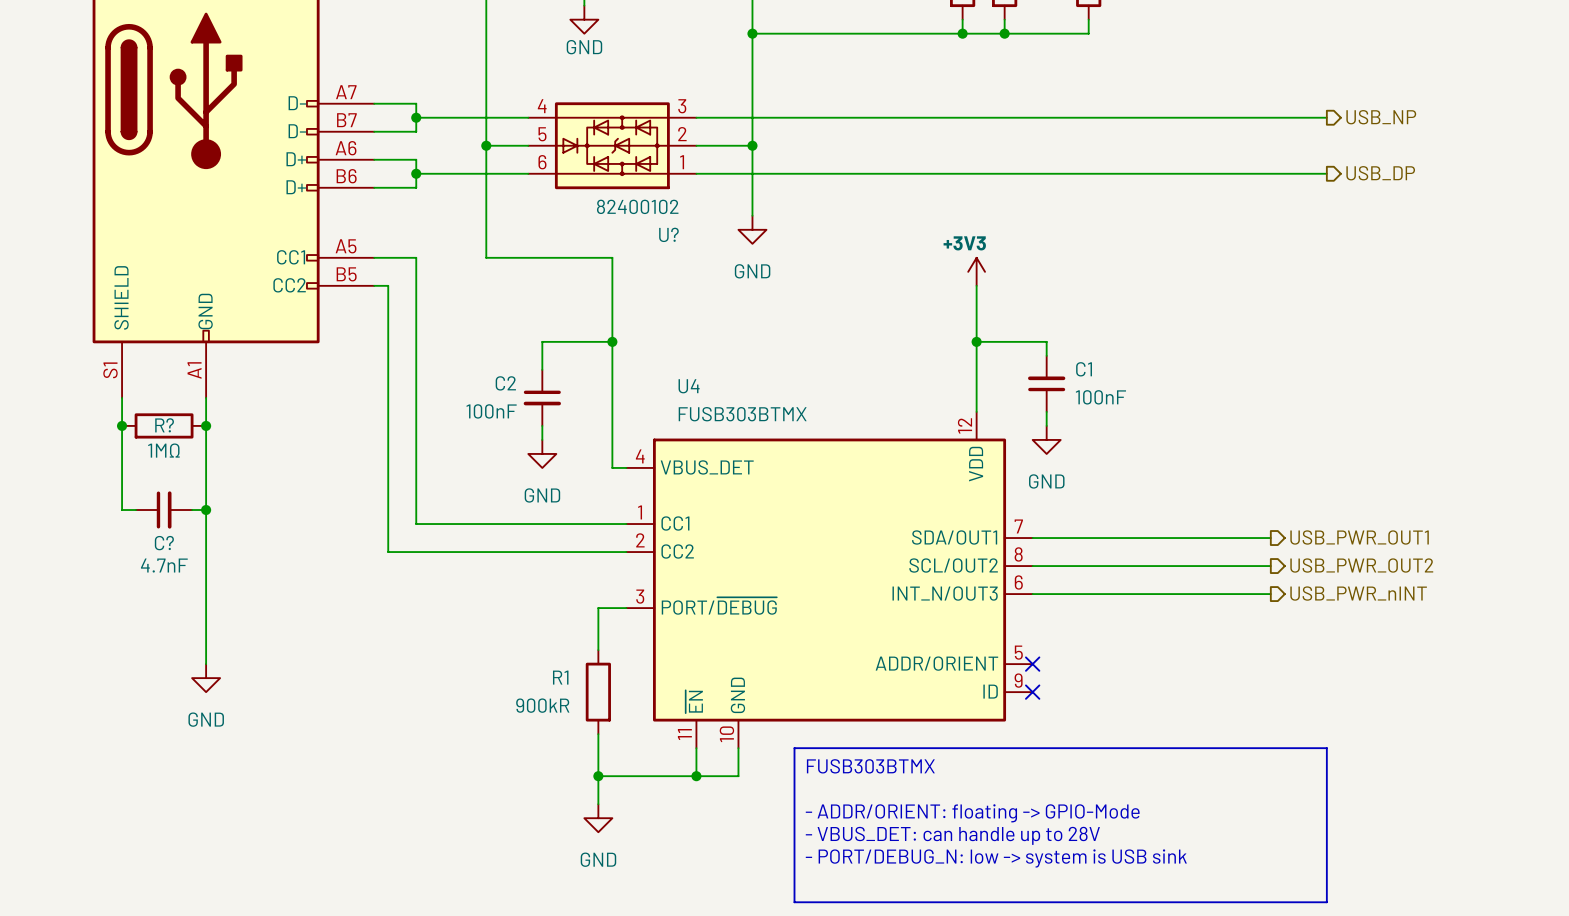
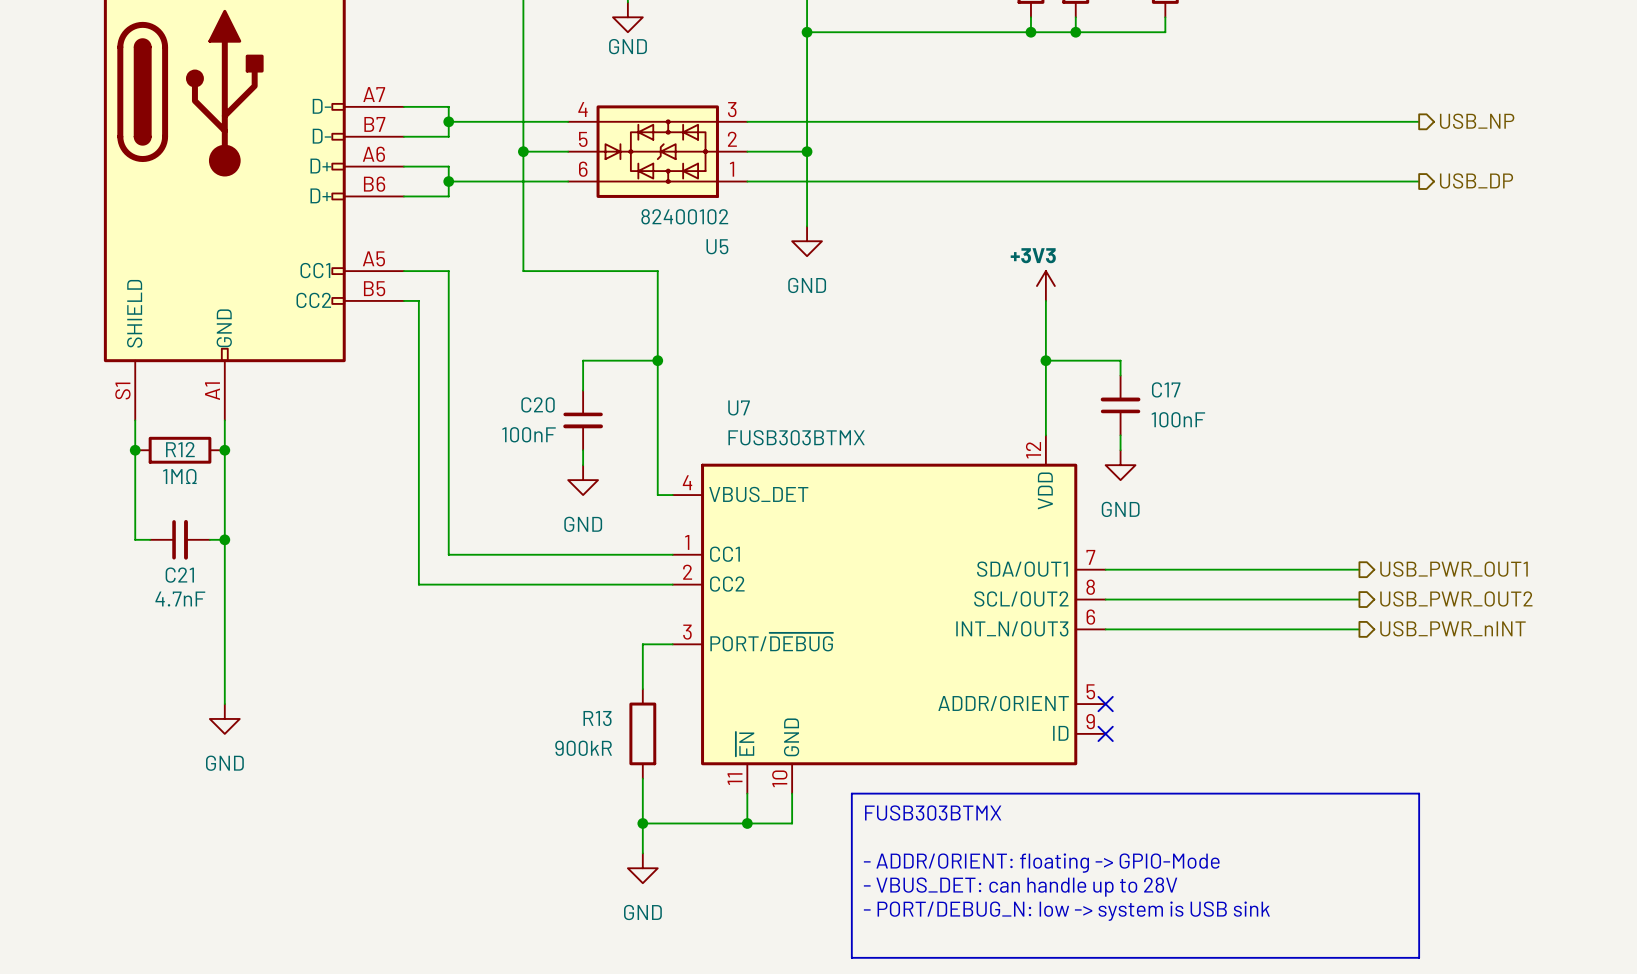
U? name: U? (668, 234) -> U5 (717, 246)
C1 name: C1 (1084, 369) -> C17 (1166, 389)
C2 name: C2 (505, 383) -> C20 (538, 404)
U4 name: U4 (689, 386) -> U7 (739, 407)
R? name: R? (164, 425) -> R12 (180, 449)
C? name: C? (164, 543) -> C21 (179, 575)
R1 name: R1 (560, 677) -> R13 (597, 718)

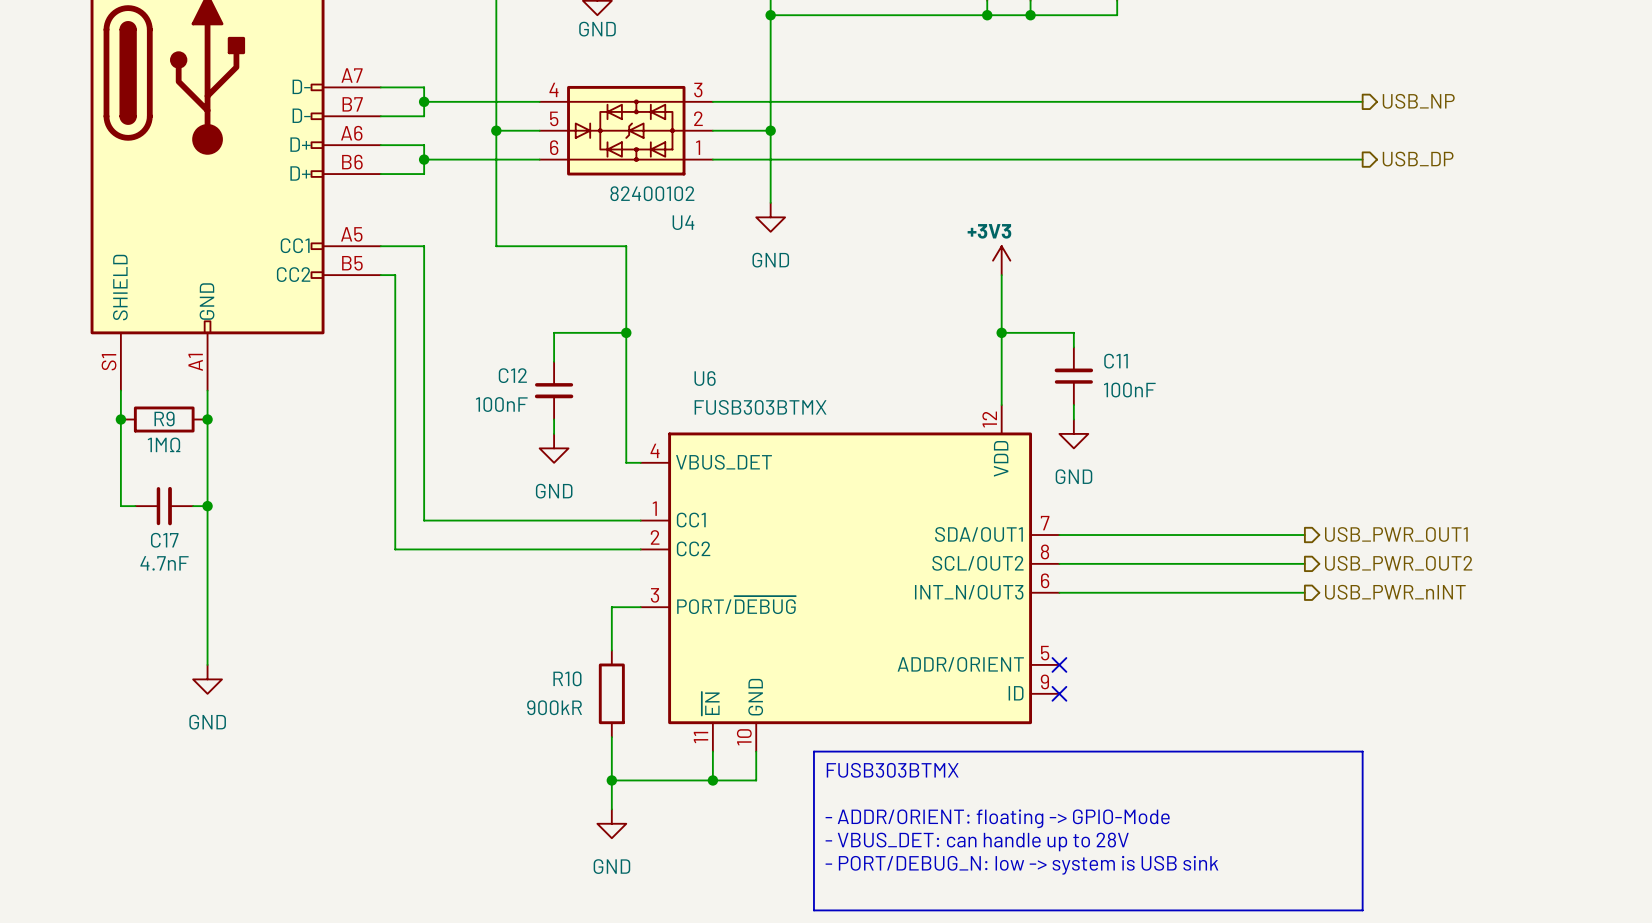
U5 name: U5 (717, 246) -> U4 (683, 222)
C17 name: C17 (1166, 389) -> C11 (1116, 361)
C20 name: C20 (538, 404) -> C12 (512, 375)
U7 name: U7 (739, 407) -> U6 (705, 378)
R12 name: R12 (180, 449) -> R9 (164, 418)
C21 name: C21 (179, 575) -> C17 (164, 540)
R13 name: R13 (597, 718) -> R10 (567, 678)

